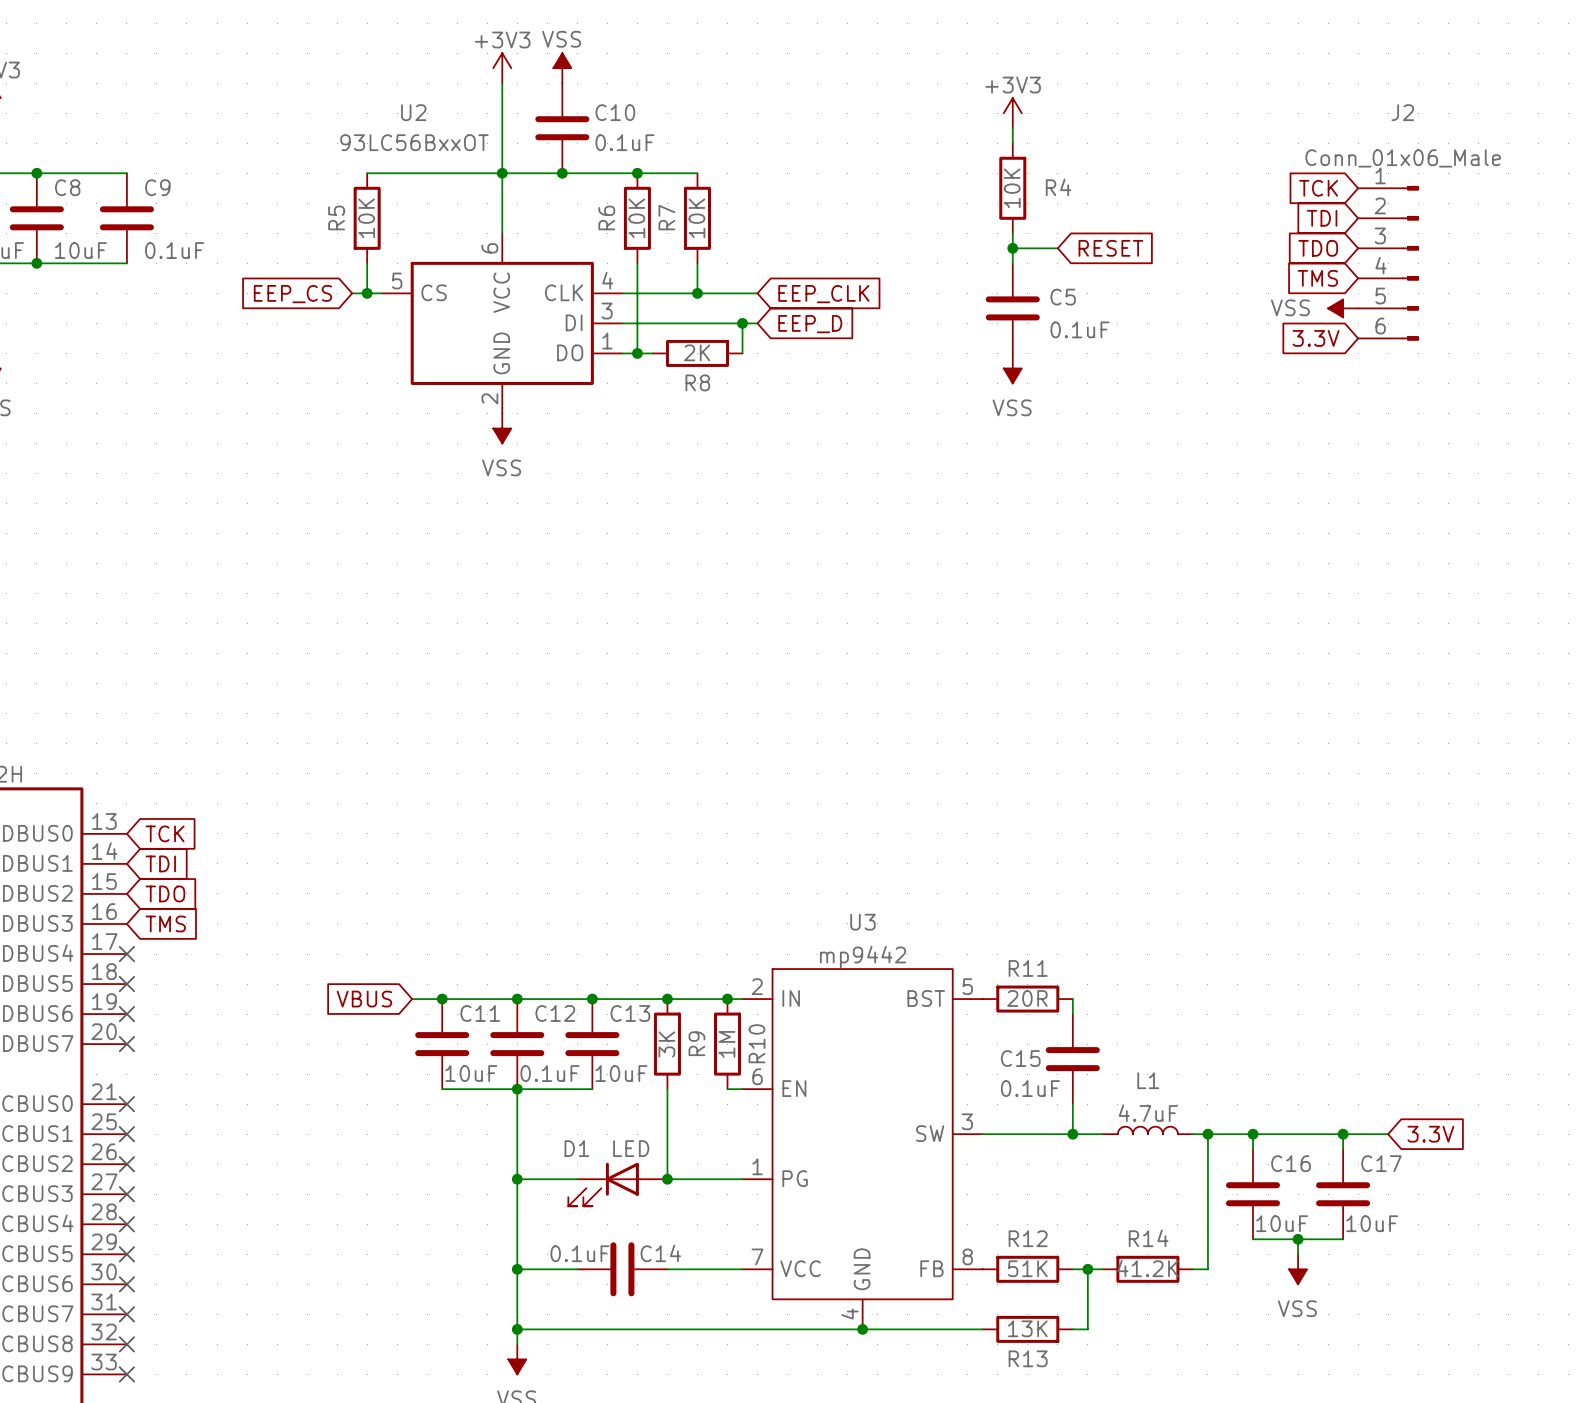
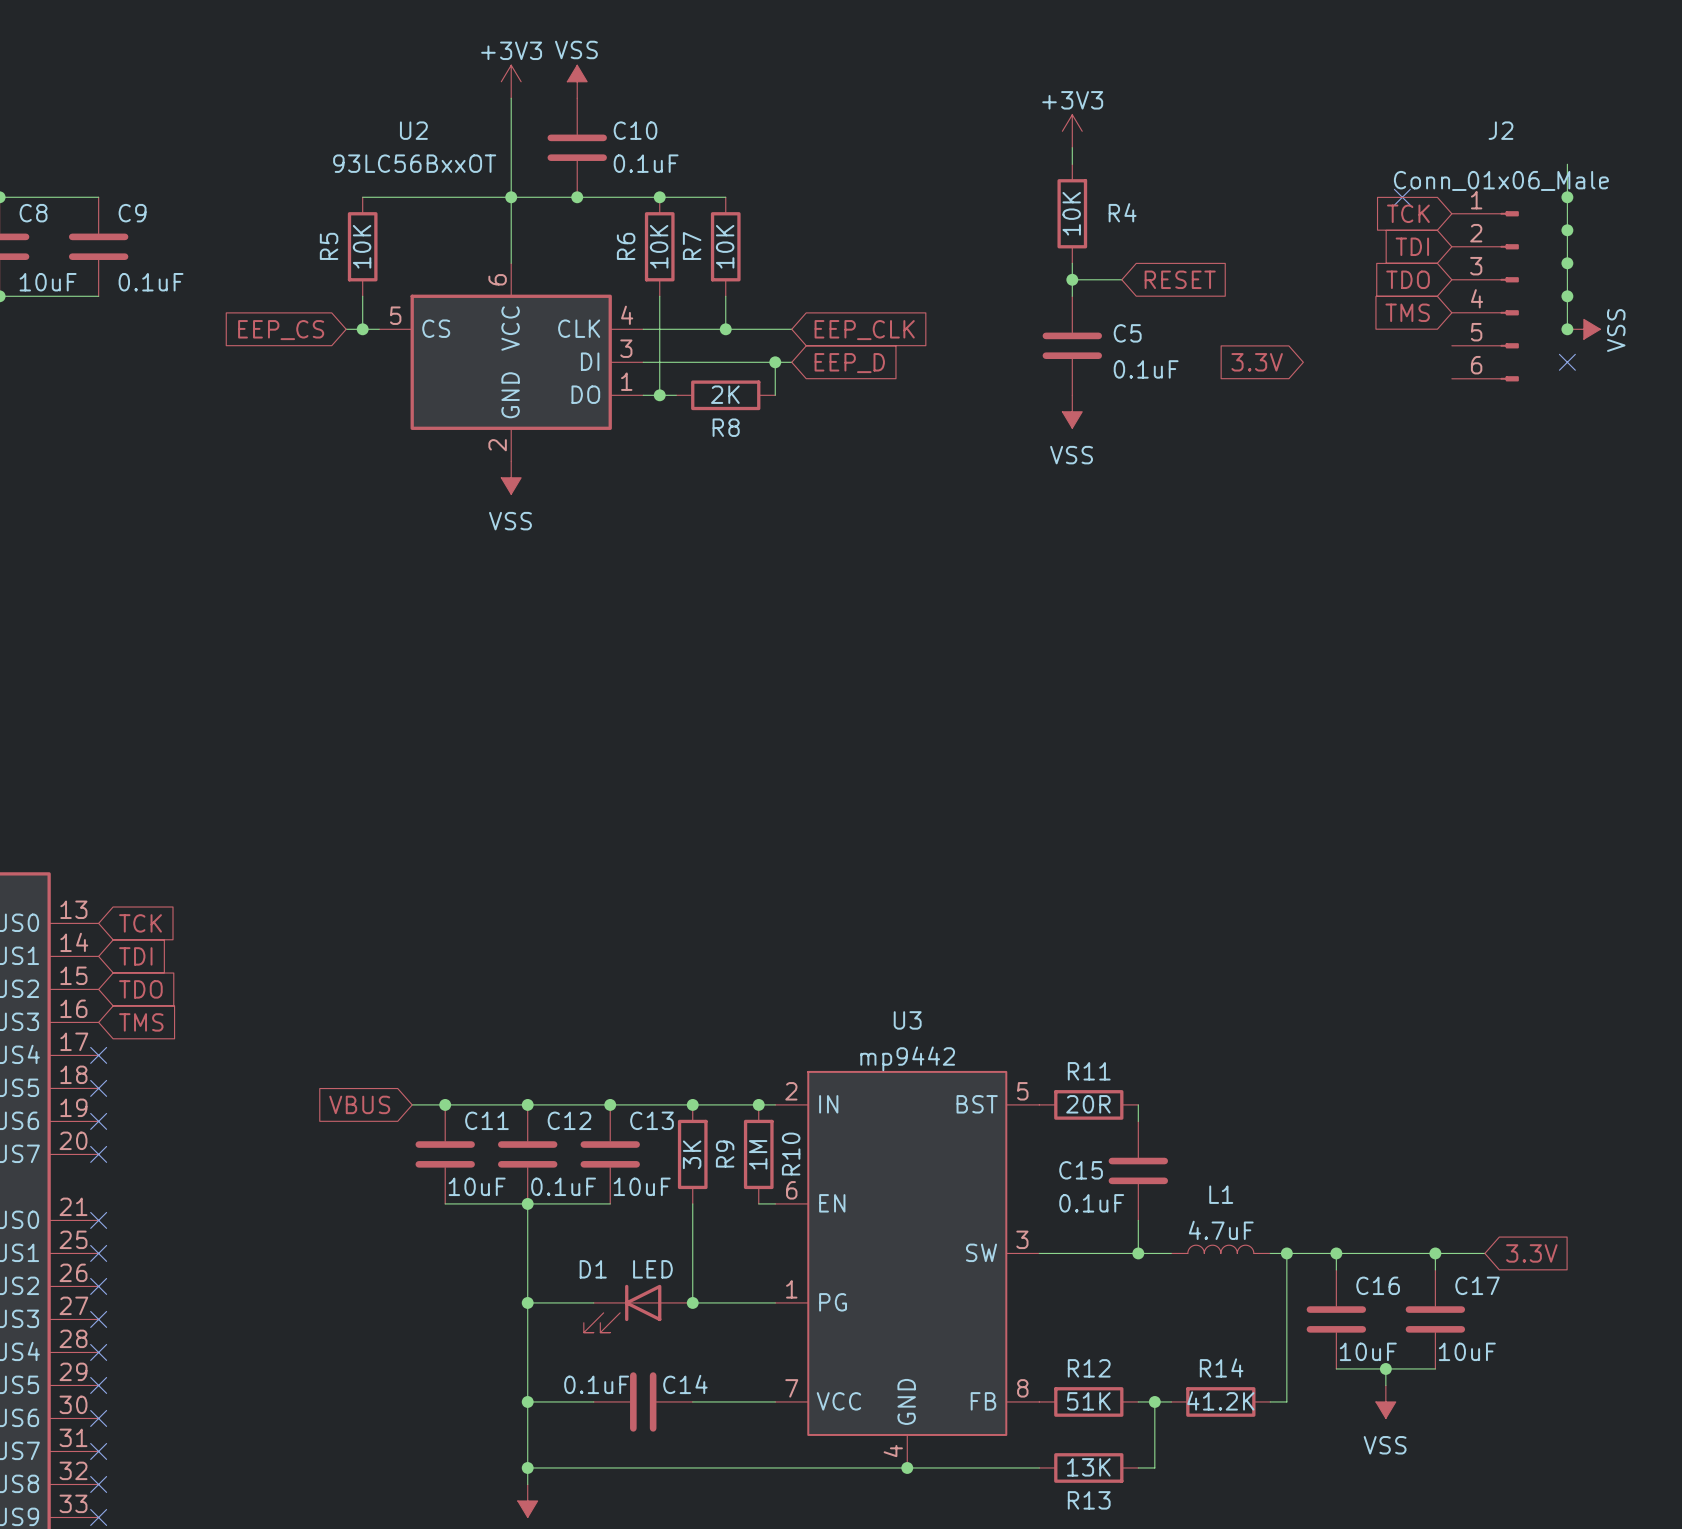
wire: none -> (1567, 164) (1567, 329)
no-connect mark: none -> (1402, 197)
junction: none -> (1567, 197)
junction: none -> (1567, 230)
junction: none -> (1567, 263)
junction: none -> (1567, 296)
junction: none -> (1567, 329)
power symbol text position: VSS (1290, 307) -> VSS (1616, 330)
power symbol rotation: 0° (1343, 308) -> 180° (1583, 329)
power symbol position: VSS (1343, 308) -> VSS (1583, 329)
no-connect mark: none -> (1567, 362)
global label position: 3.3V (1316, 338) -> 3.3V (1257, 362)

